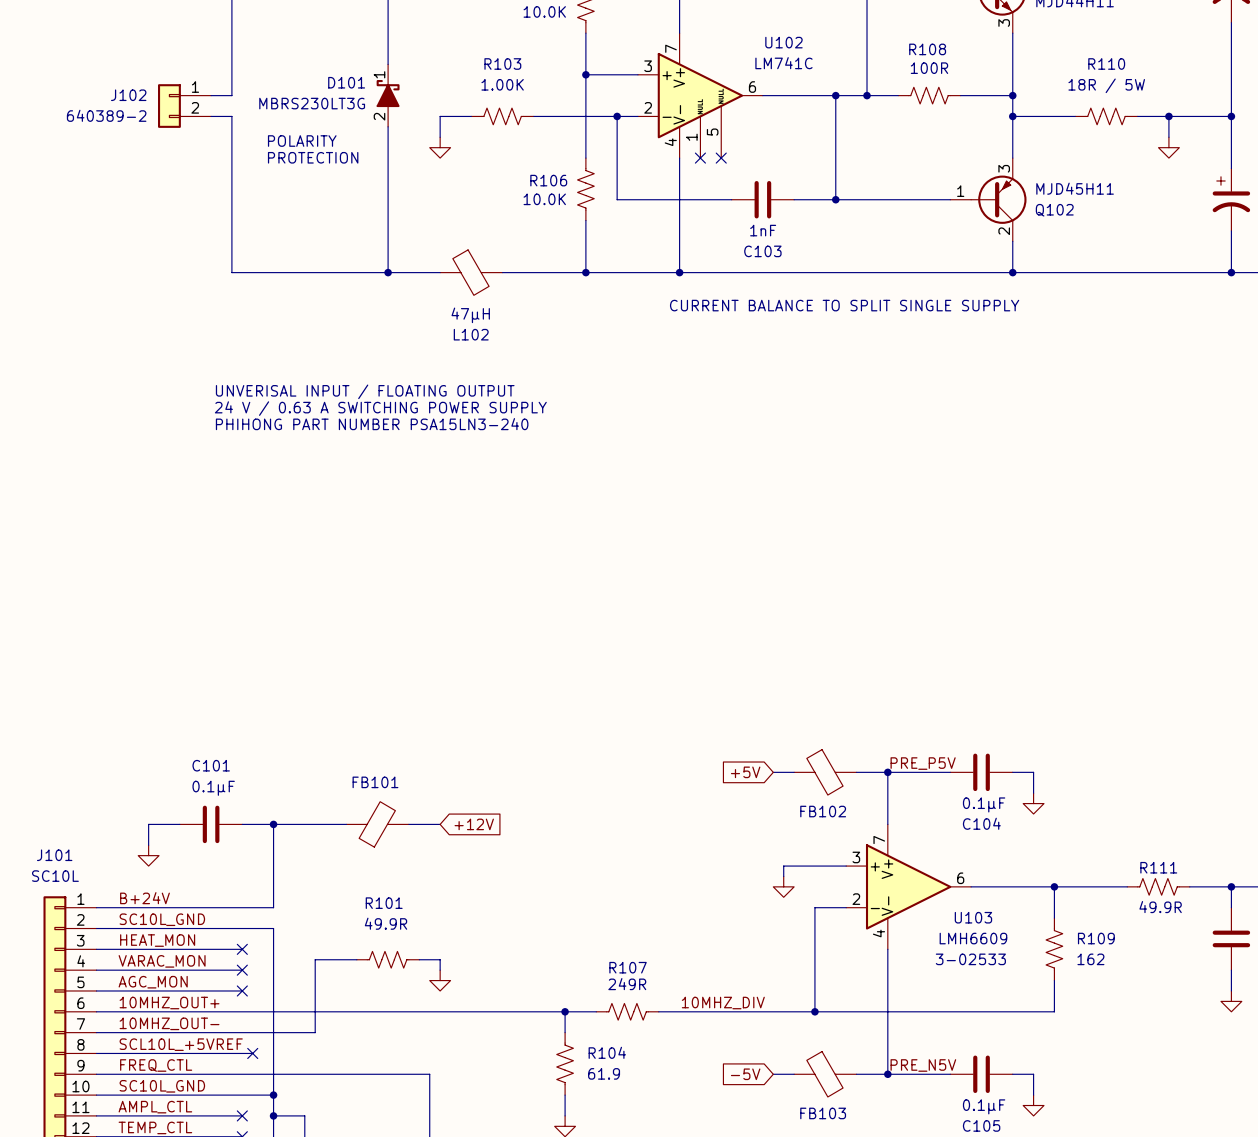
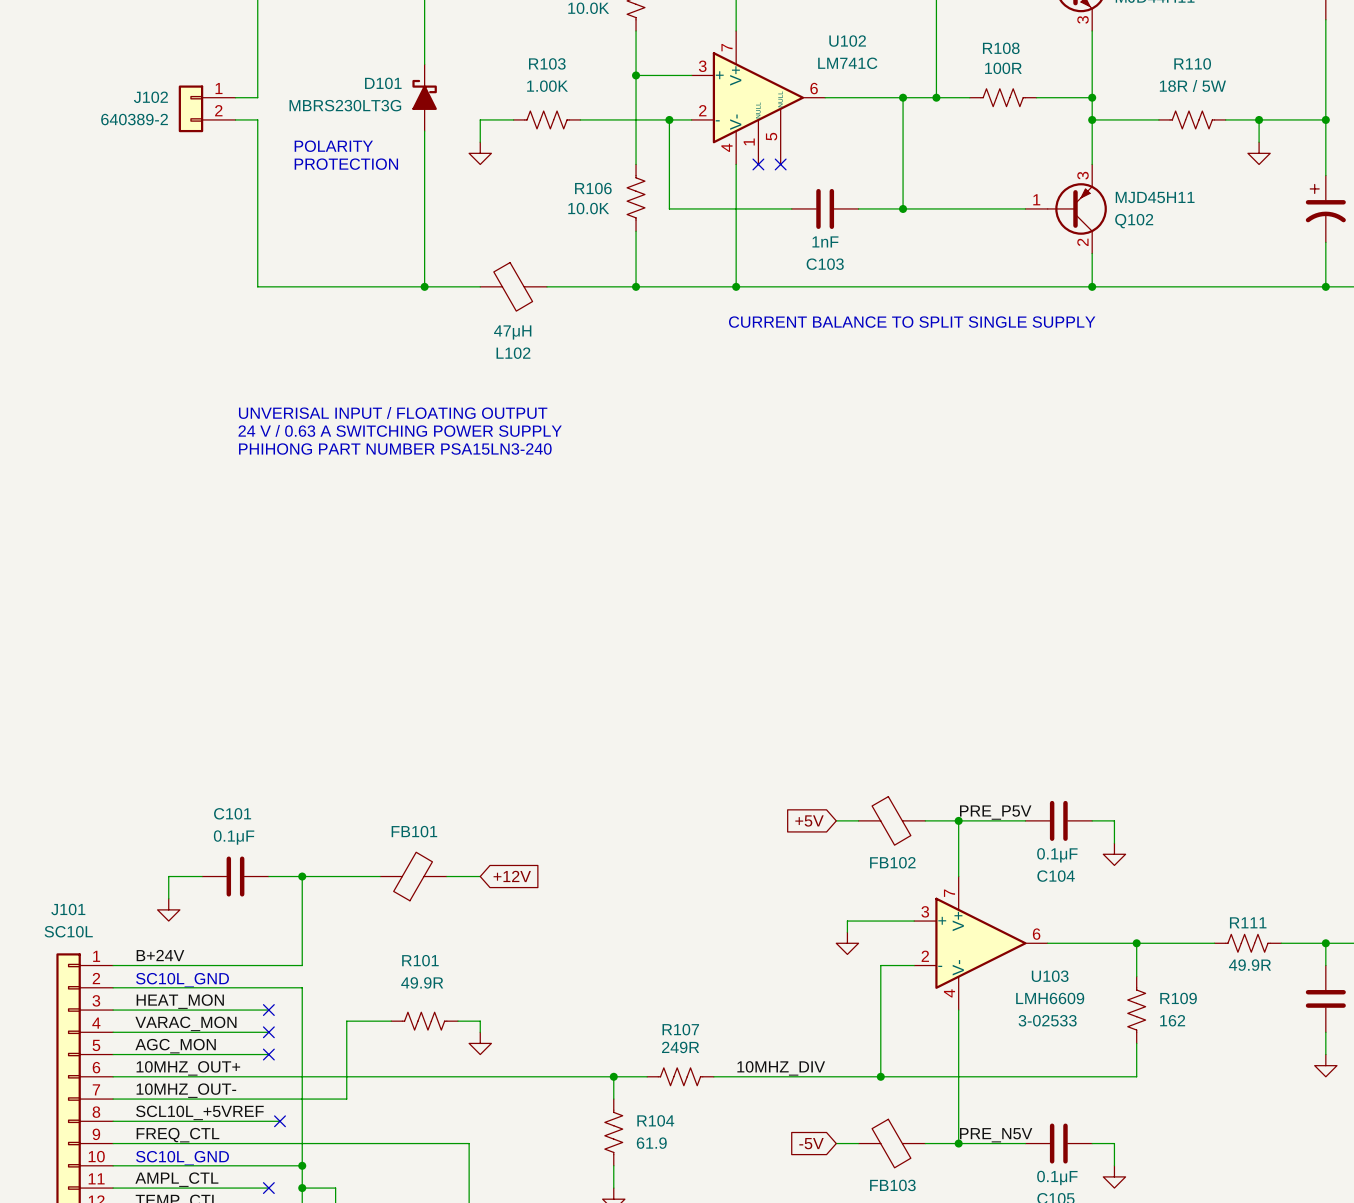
D101 symbol: [376, 64, 400, 127] -> [412, 64, 437, 132]
label: SC10L_GND (162, 919) -> none
text: none -> SC10L_GND (182, 980)
label: SC10L_GND (162, 1086) -> none
text: none -> SC10L_GND (182, 1158)

